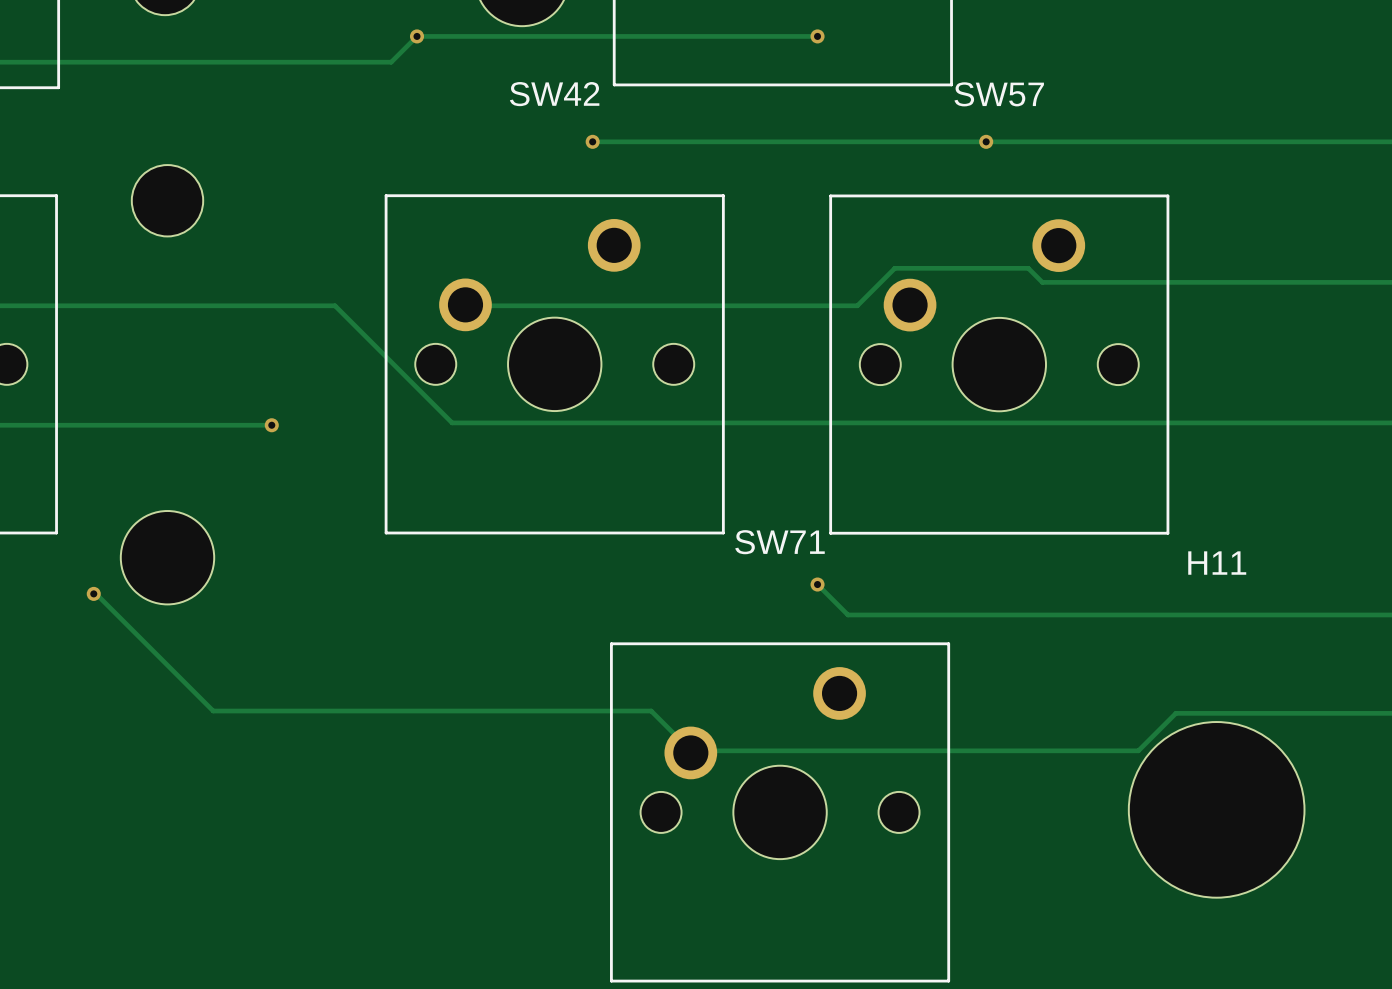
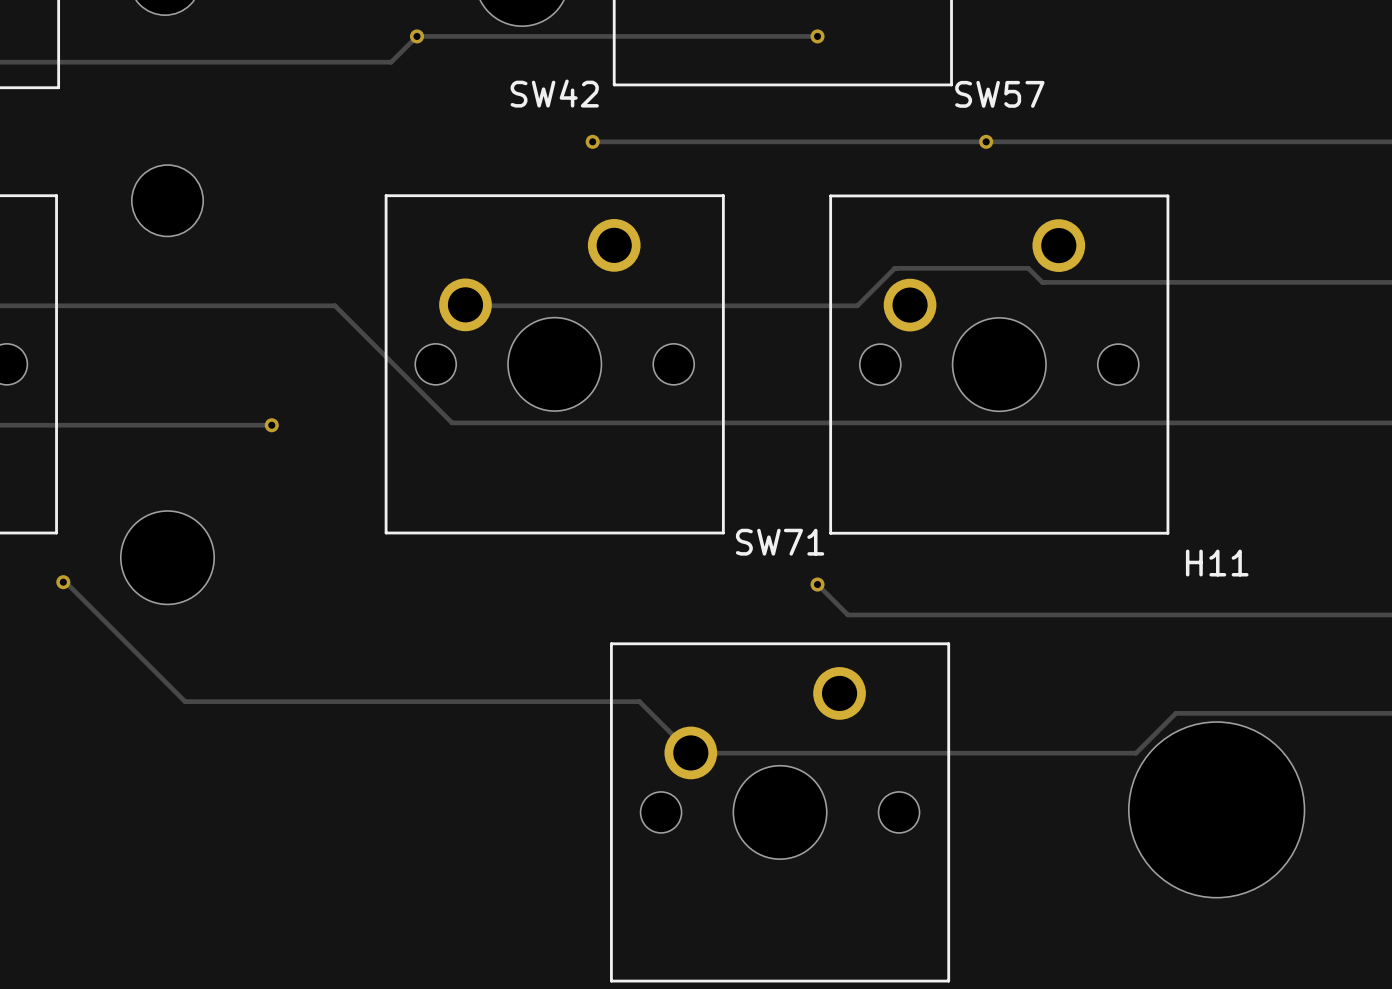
via position: (93, 593) -> (63, 582)
track: (96, 593) (213, 711) (651, 711) (691, 750) (1138, 750) -> (65, 582) (185, 701) (639, 701) (691, 753) (1136, 753) (1138, 750)

